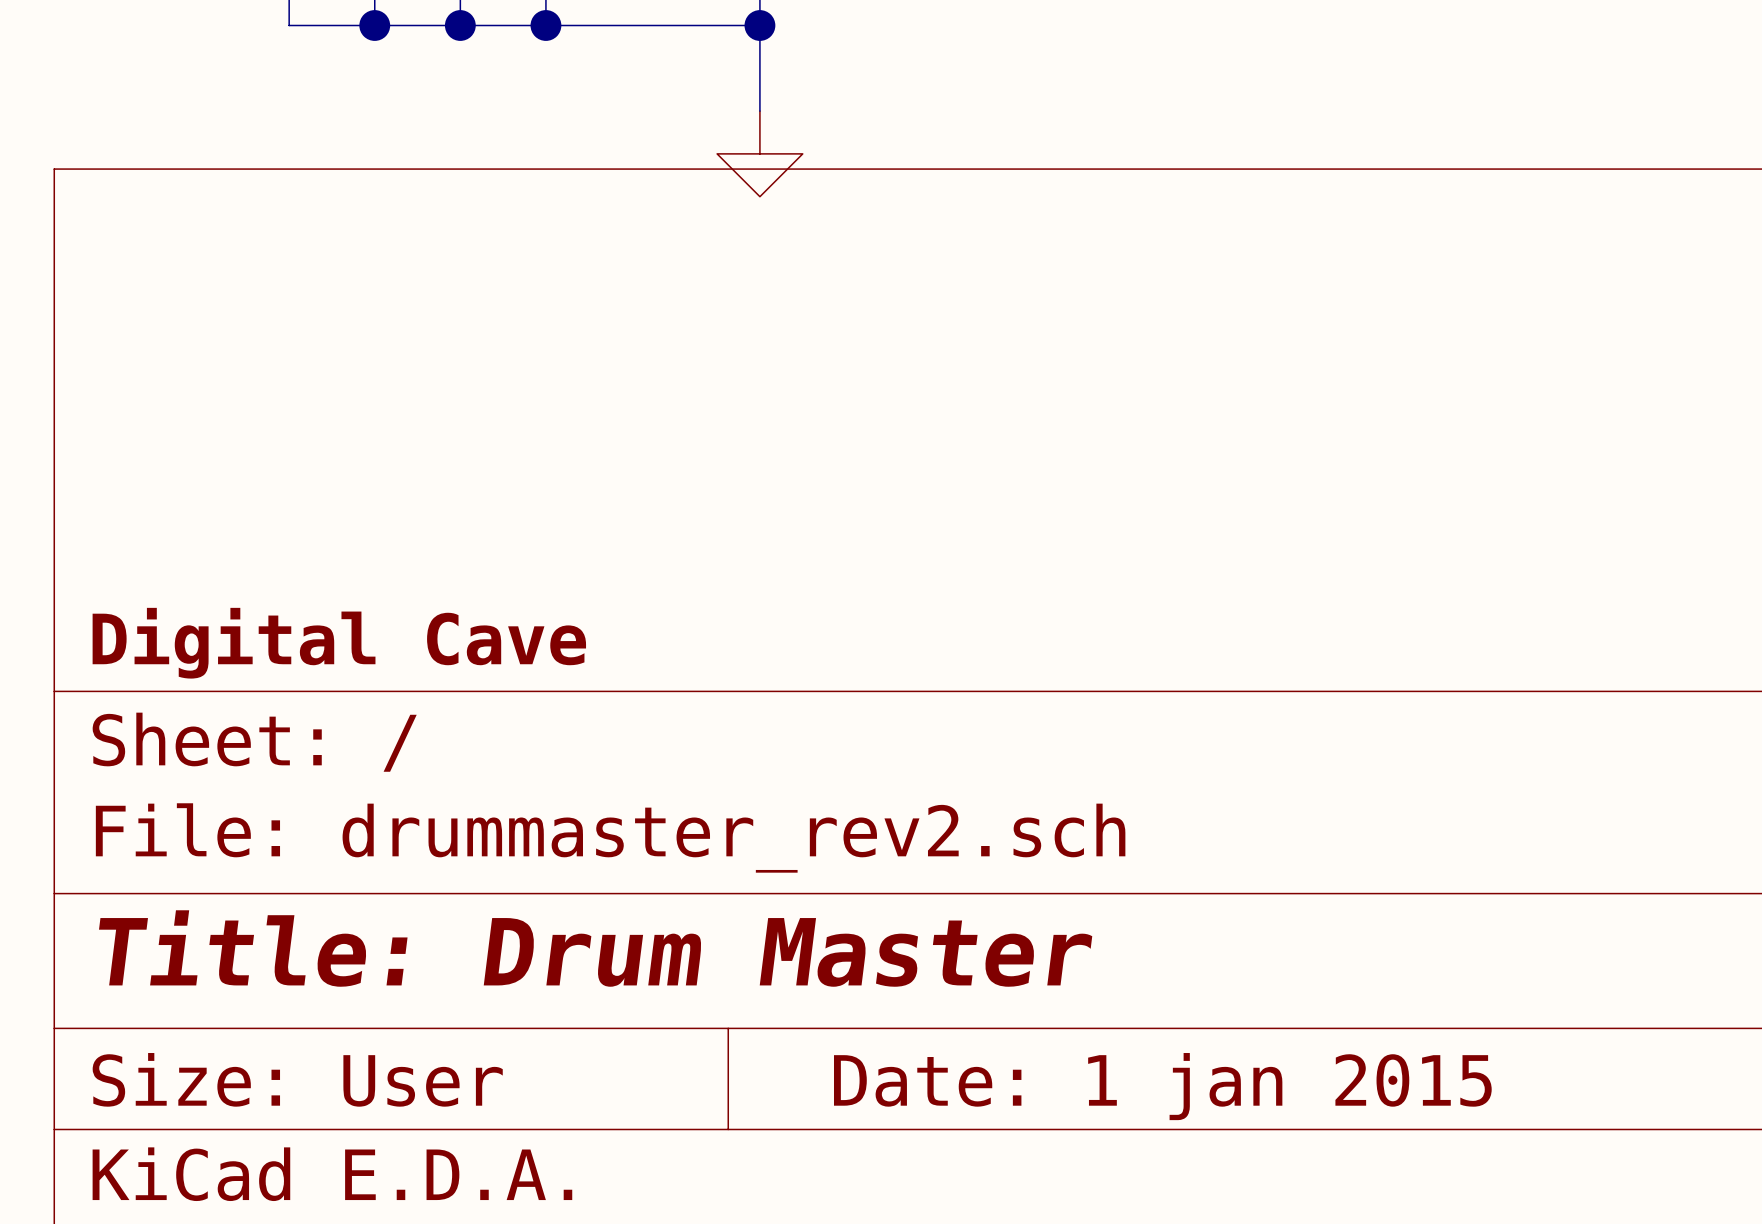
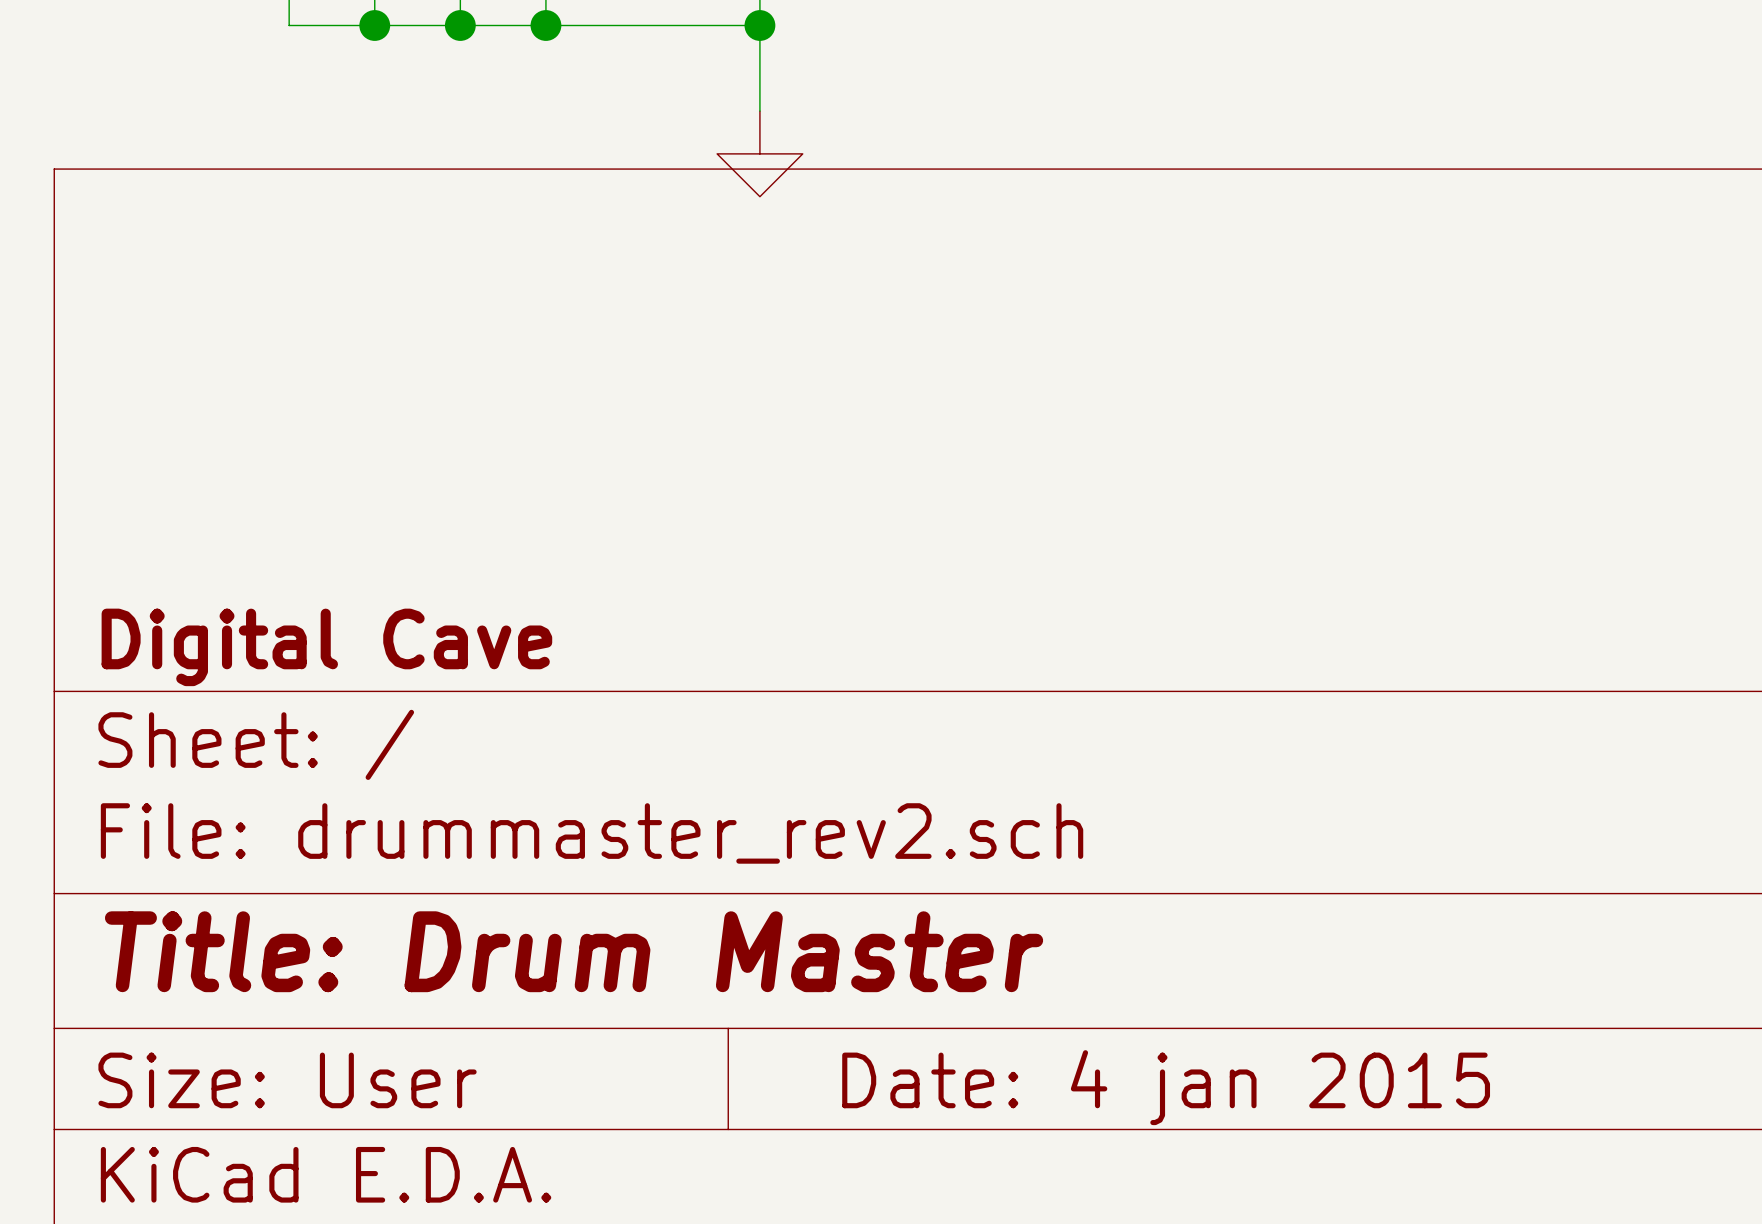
title block: Date: 1 jan 2015 (1162, 1086) -> Date: 4 jan 2015 (1166, 1087)

